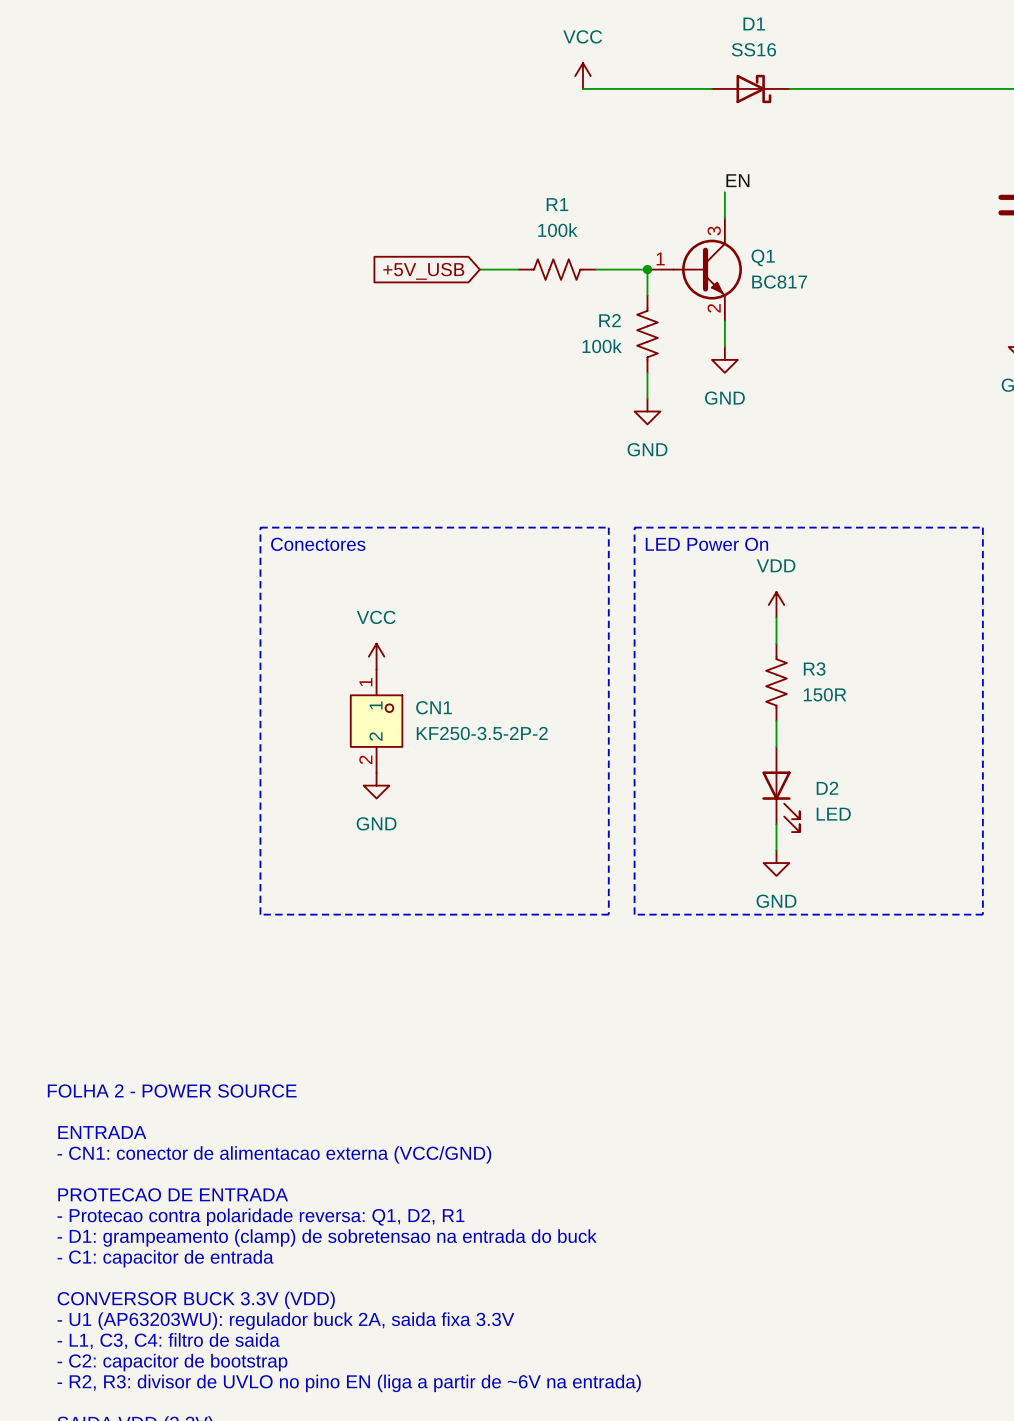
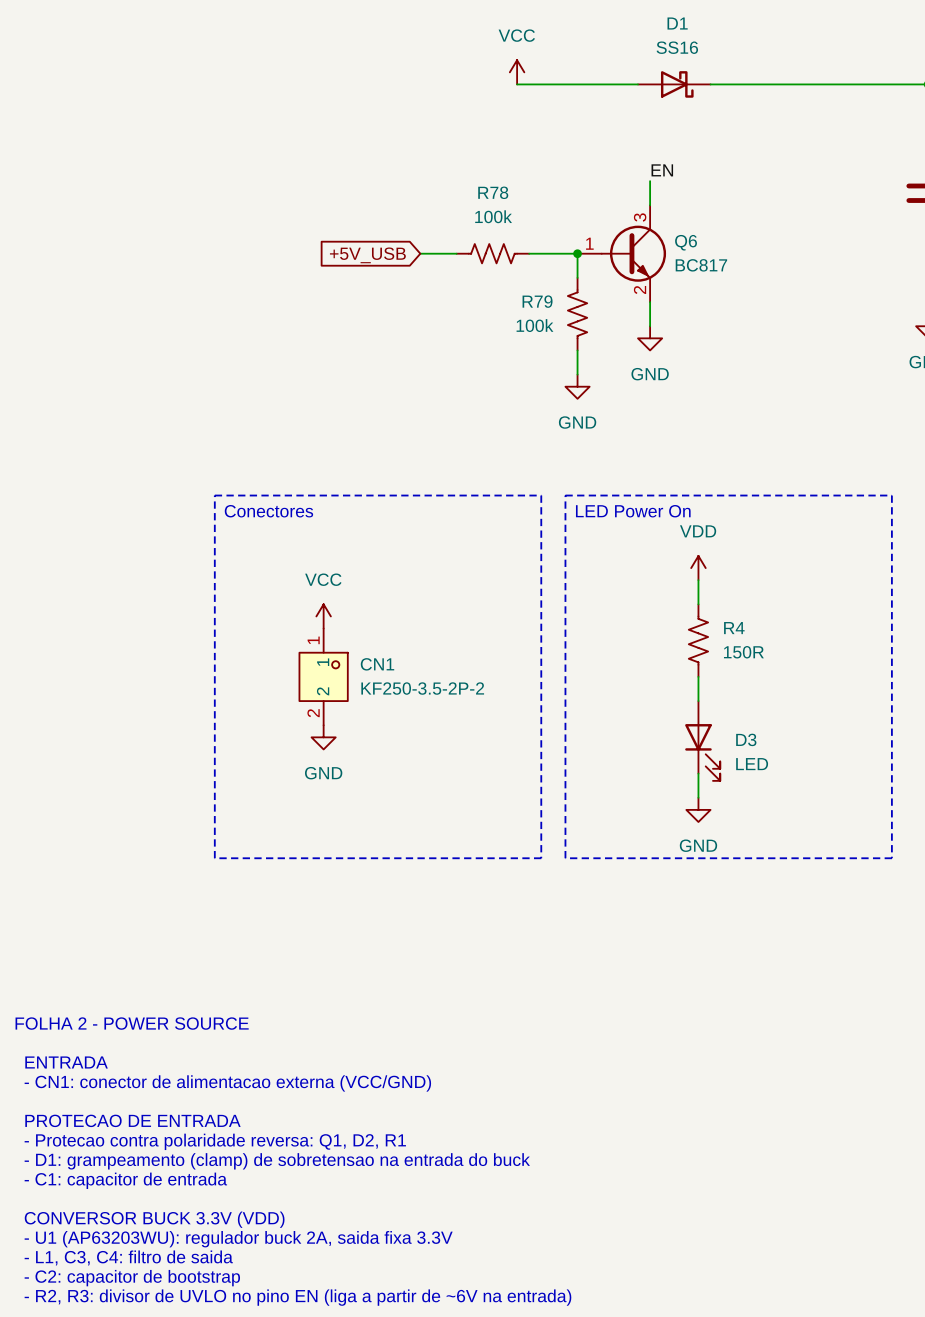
R1 name: R1 (557, 204) -> R78 (493, 192)
Q1 name: Q1 (763, 257) -> Q6 (686, 242)
R2 name: R2 (609, 320) -> R79 (537, 301)
R3 name: R3 (814, 669) -> R4 (734, 628)
D2 name: D2 (827, 788) -> D3 (746, 739)

